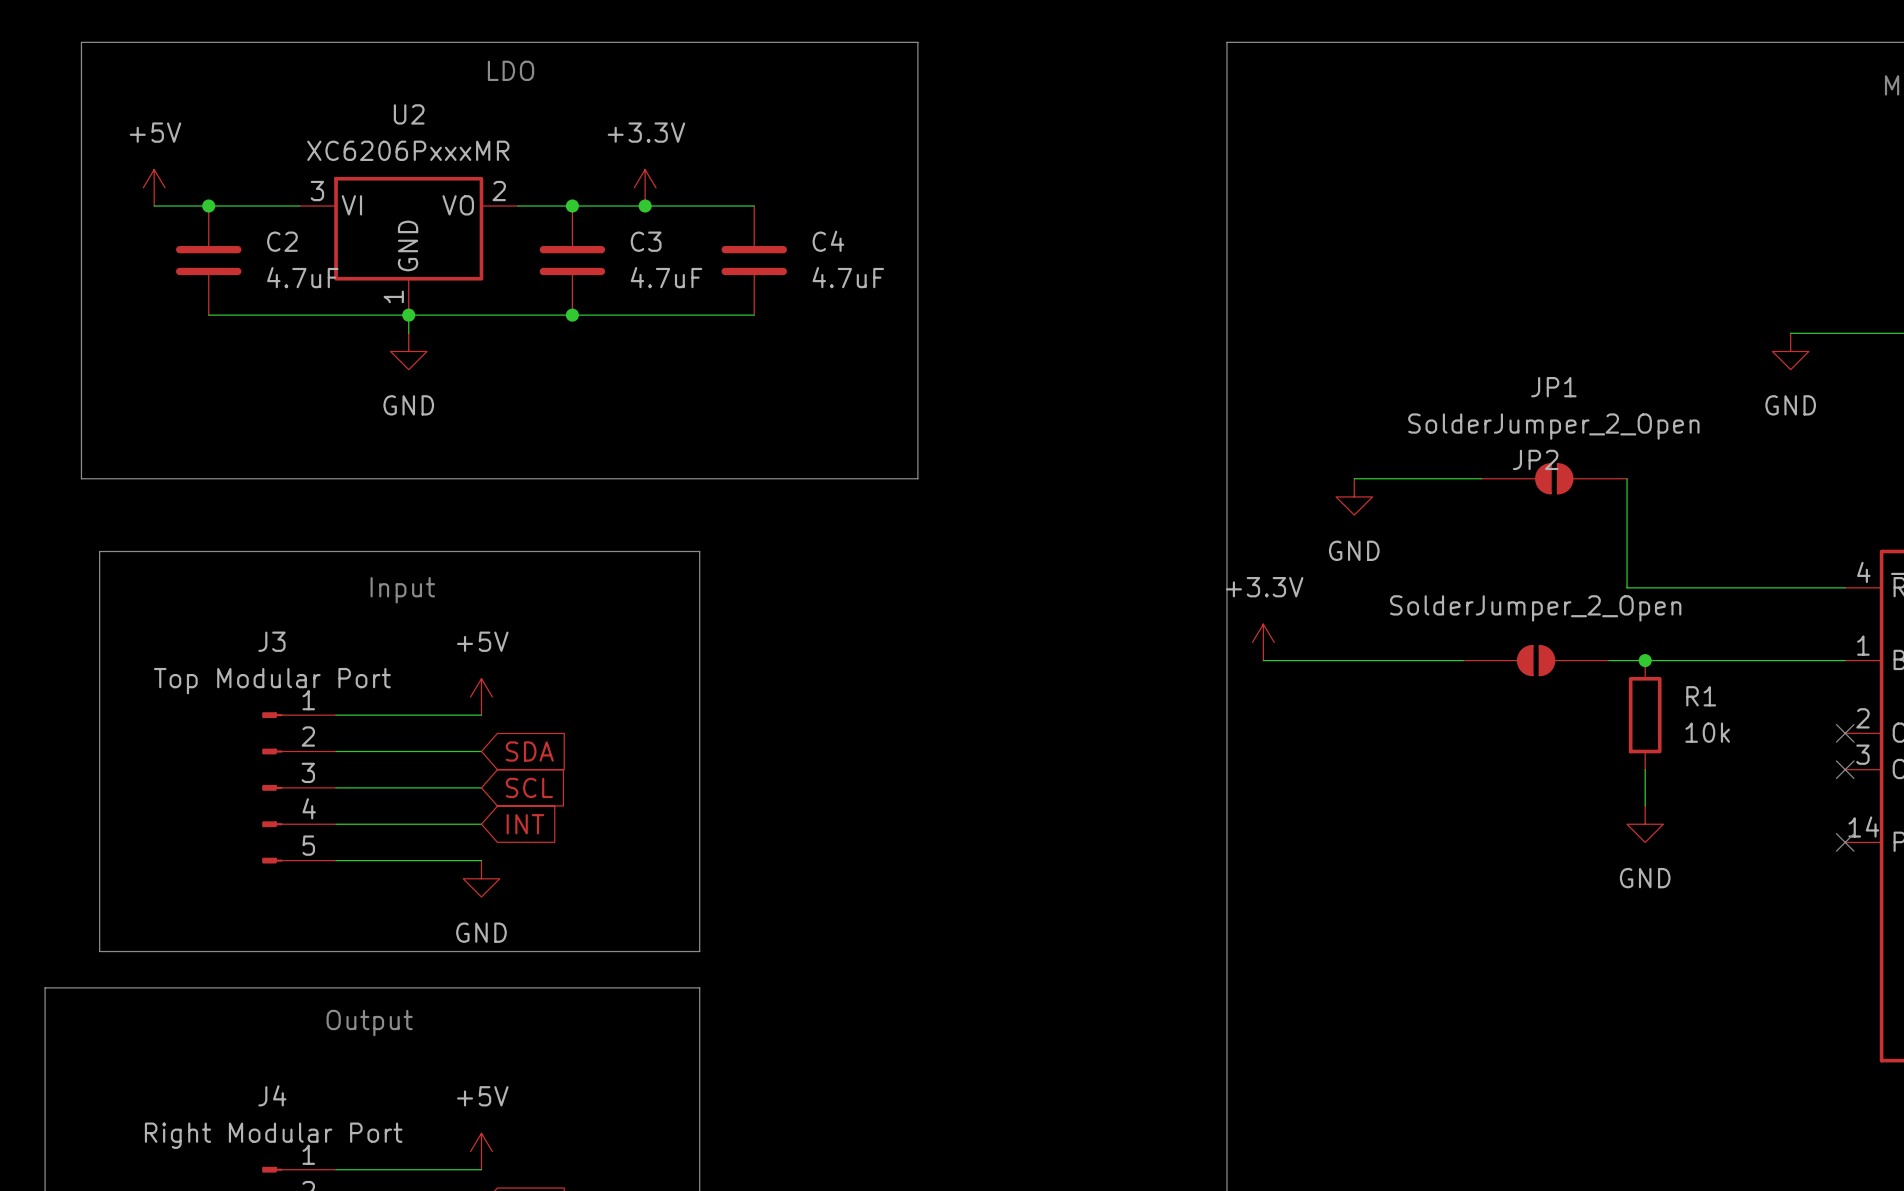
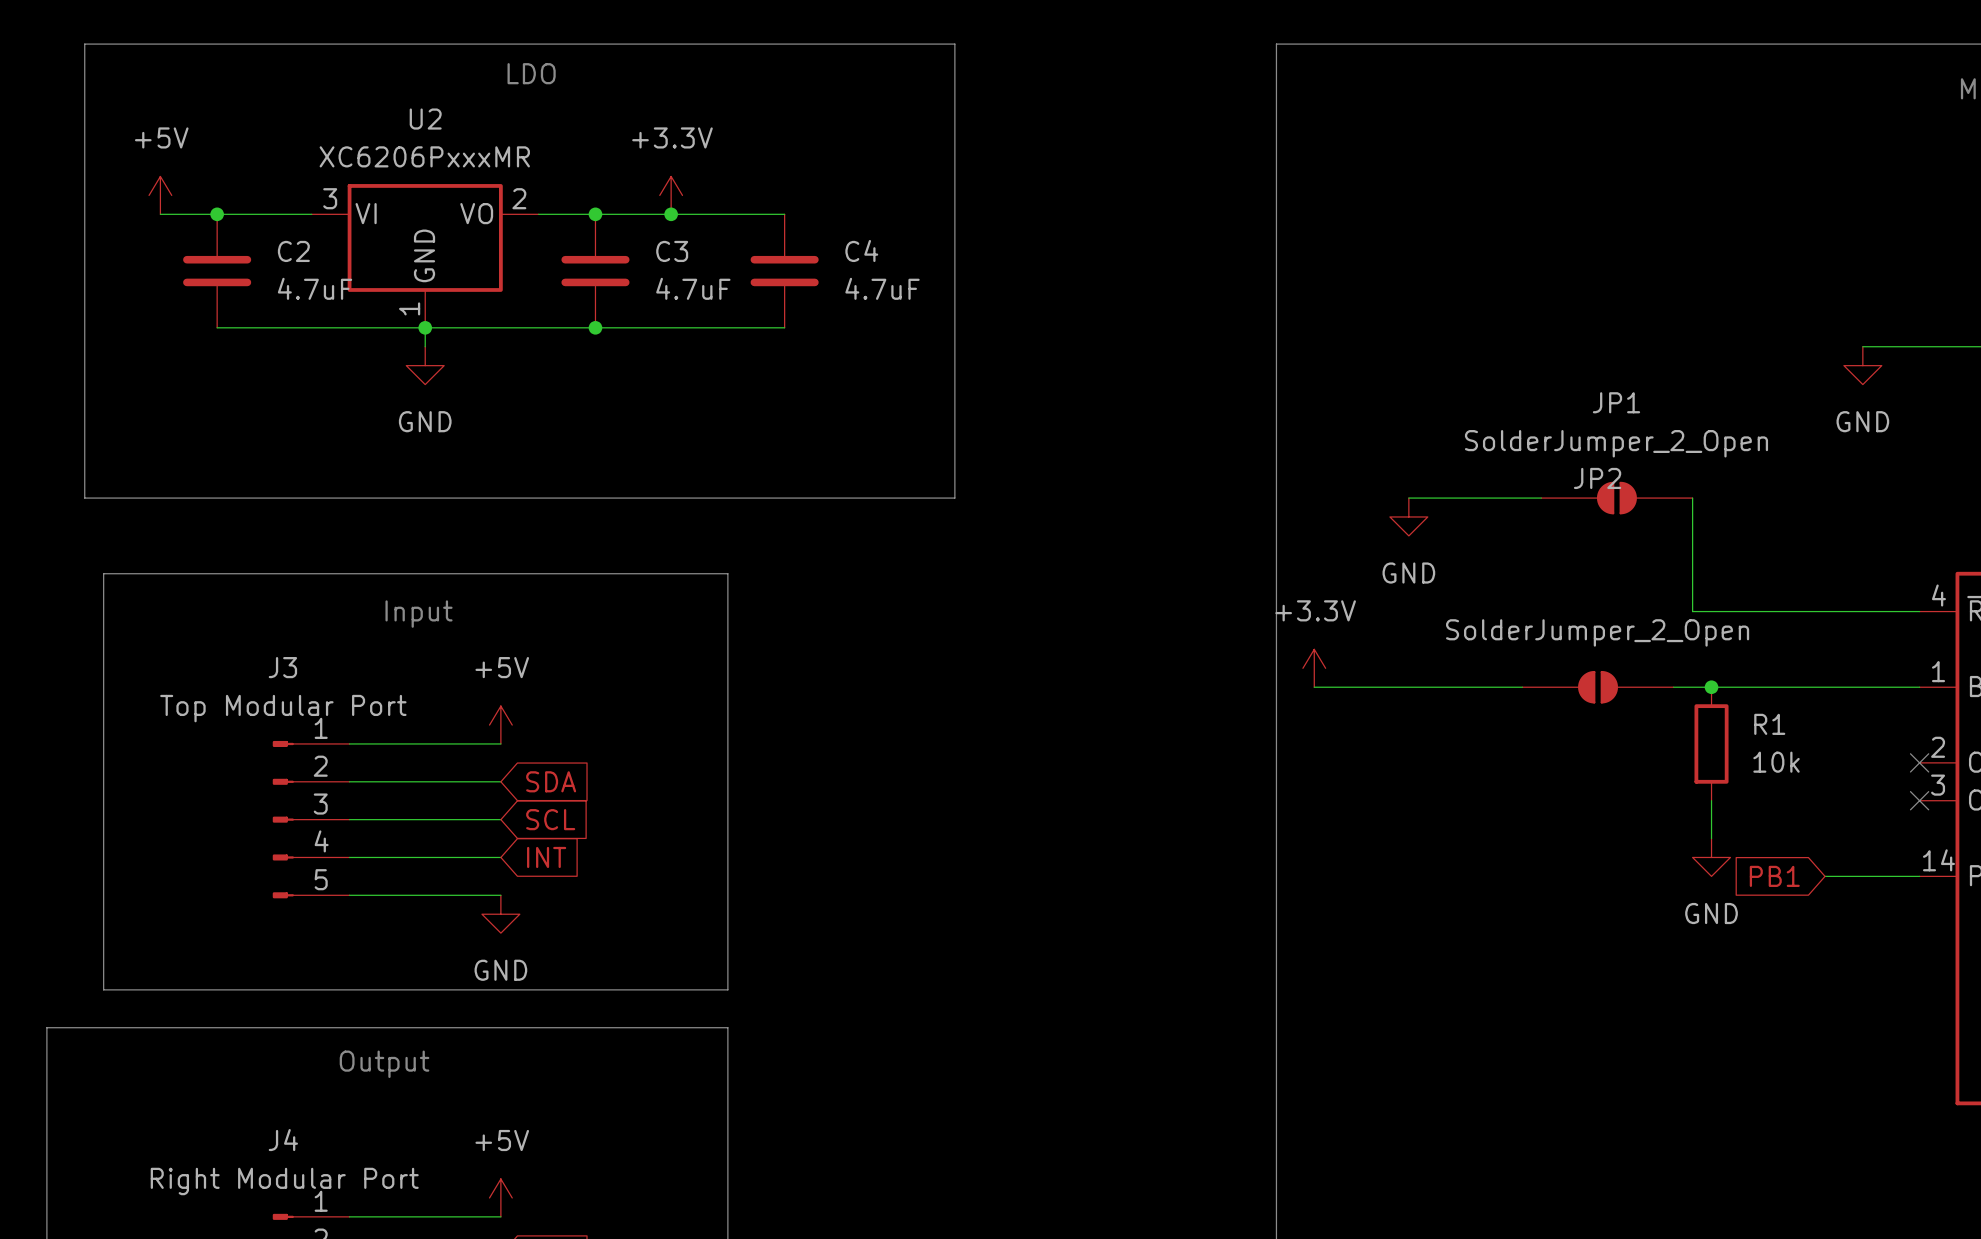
global label: none -> PB1 (1774, 876)
wire: none -> (1825, 876) (1919, 876)
no-connect mark: (1845, 842) -> none

